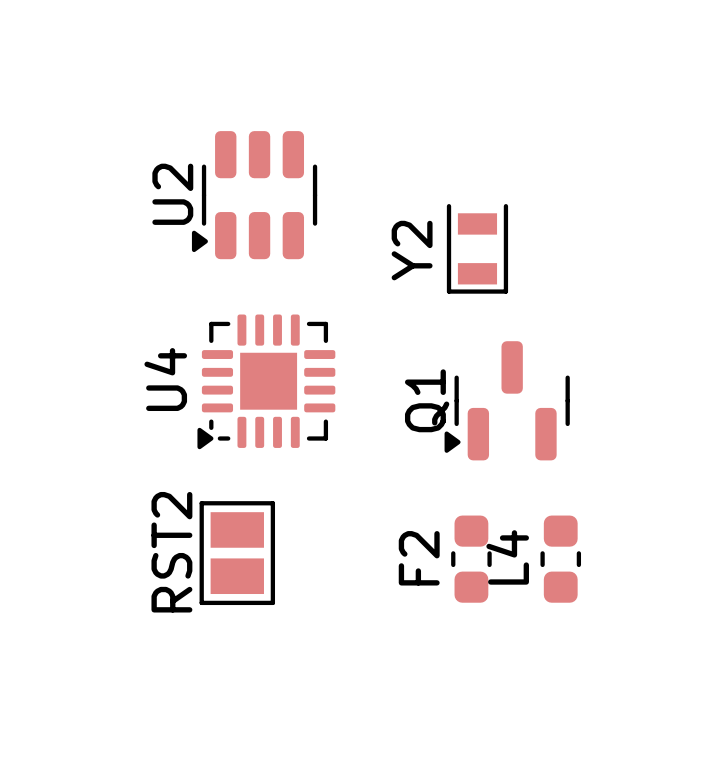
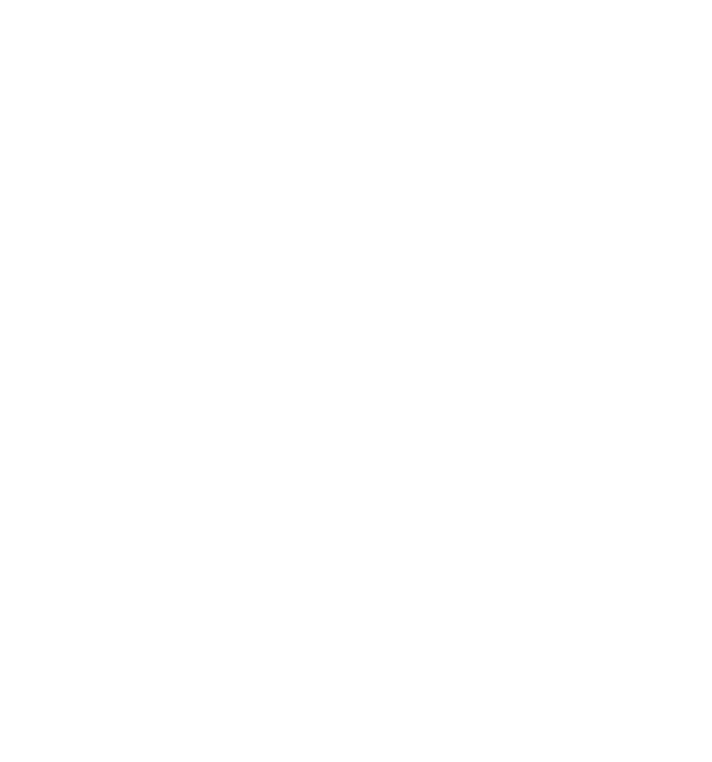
U2: (254, 195) -> none
Y2: (477, 248) -> none
U4: (266, 381) -> none
Q1: (507, 400) -> none
RST2: (237, 553) -> none
F2: (471, 559) -> none
L4: (560, 559) -> none

